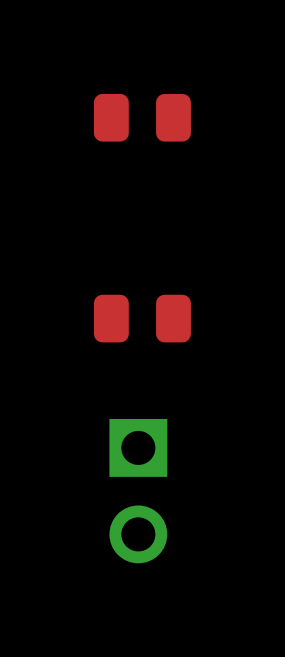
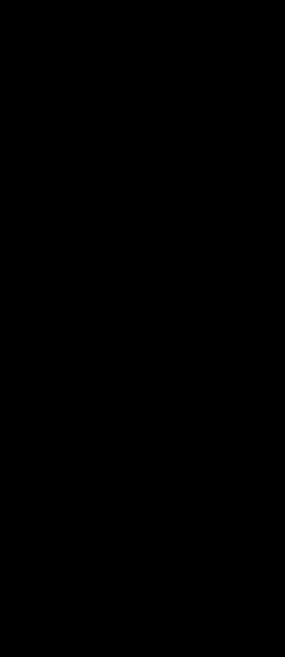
part: (142, 117) -> none
part: (142, 318) -> none
part: (138, 491) -> none

